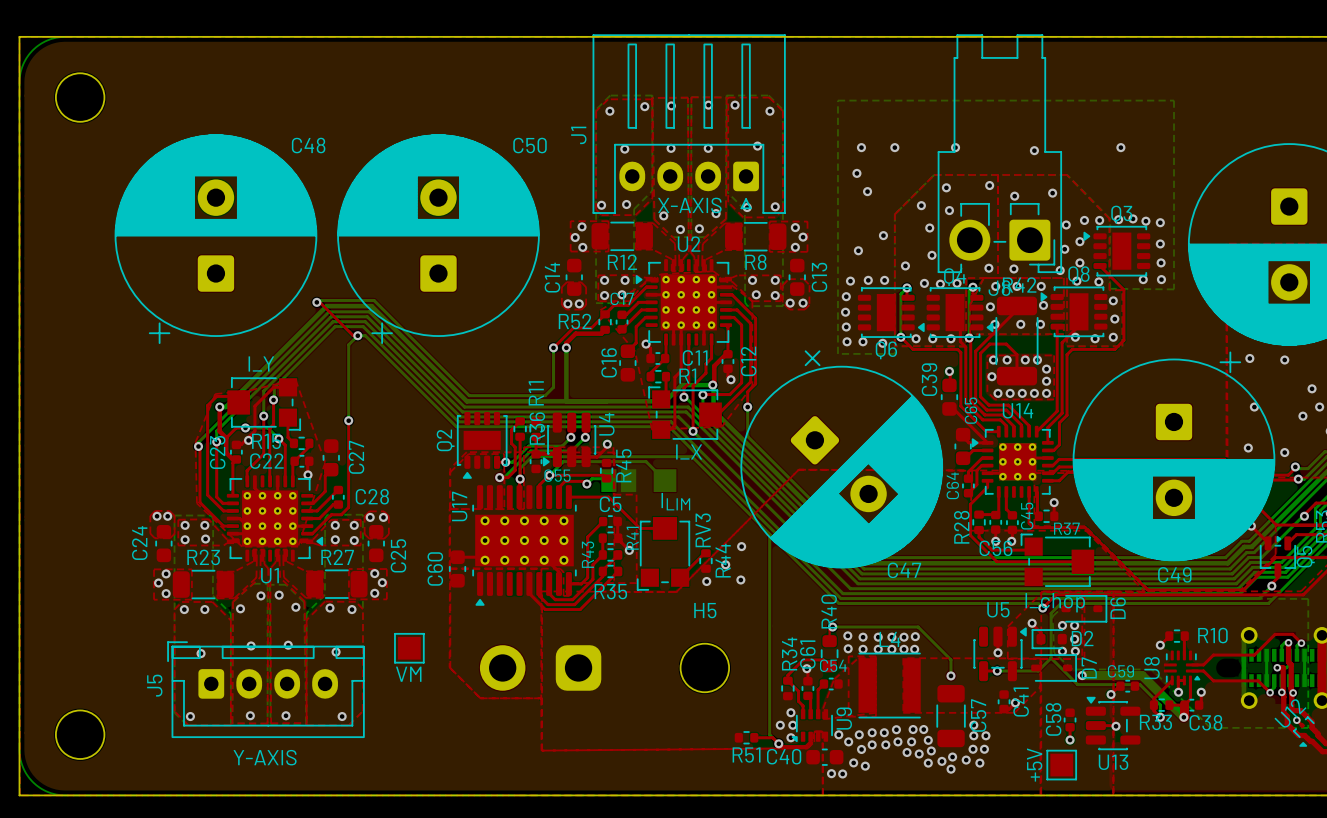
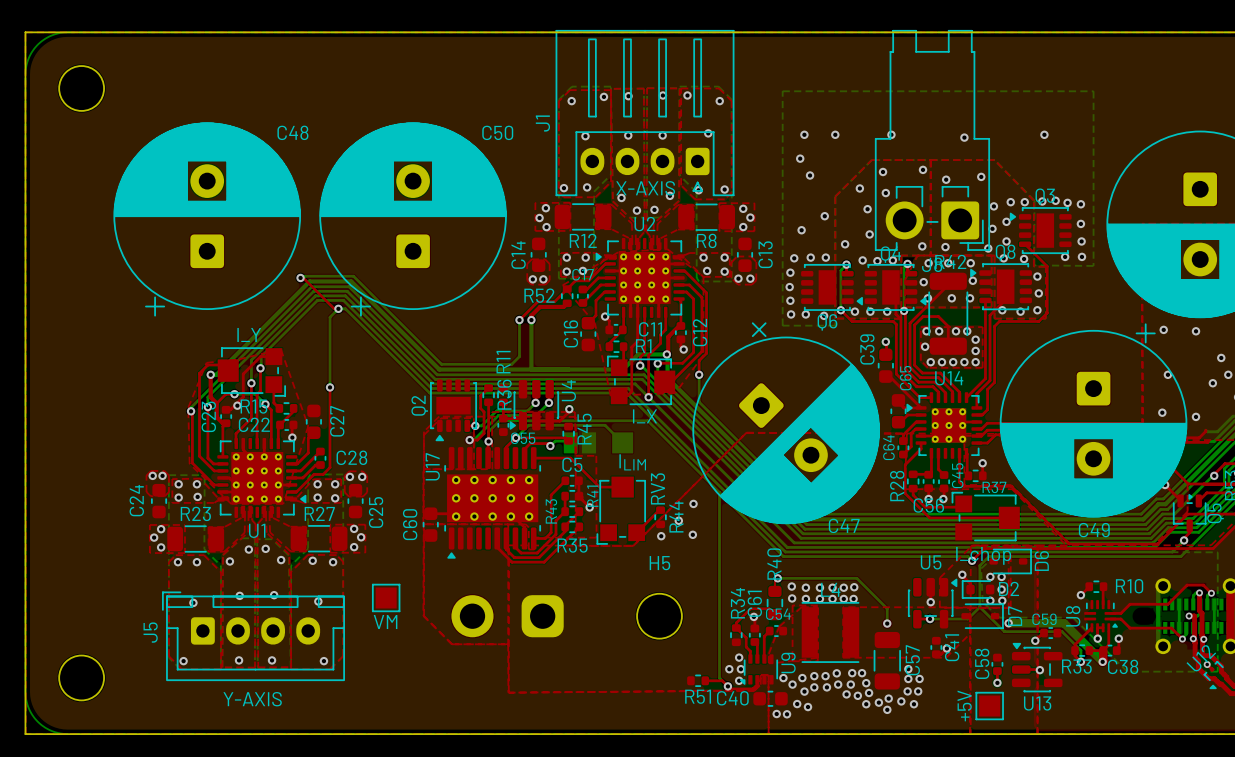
via: (1295, 466) -> none
via: (1298, 479) -> none

